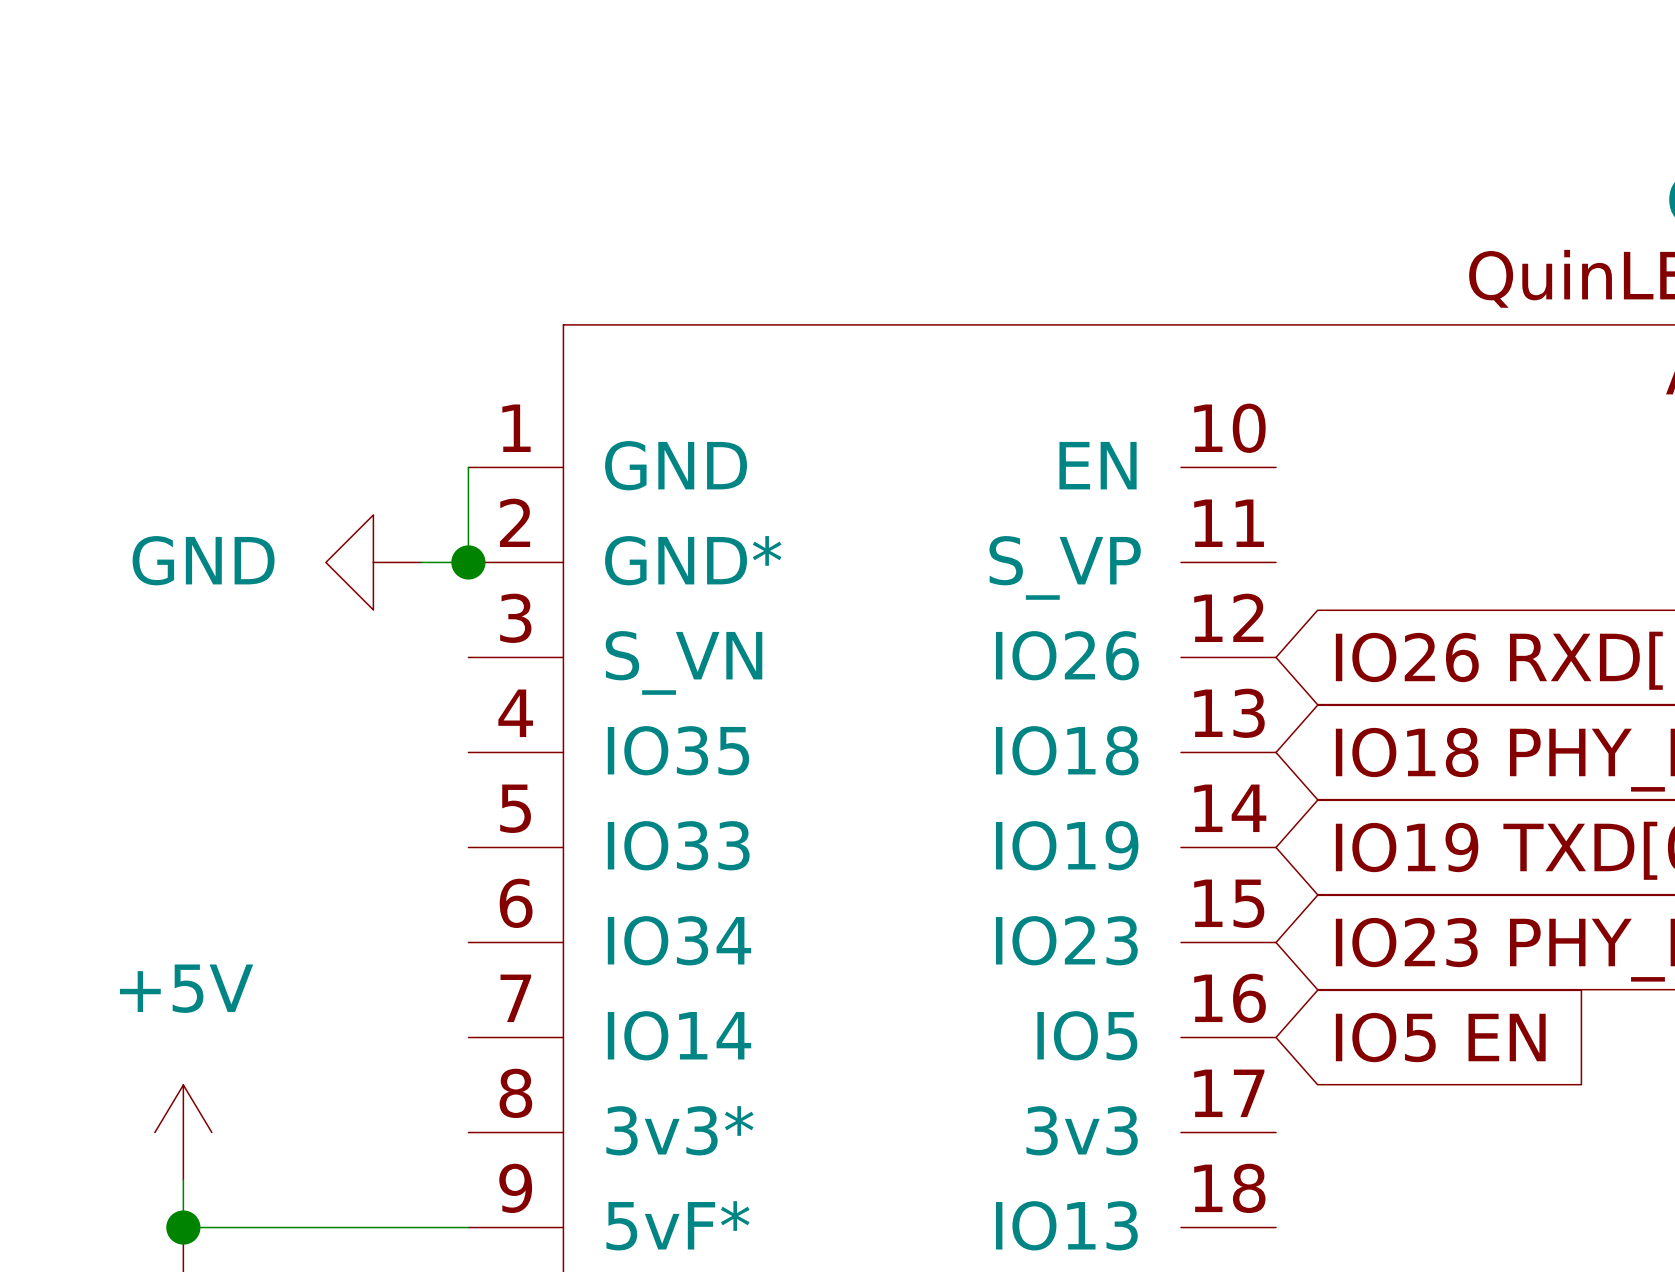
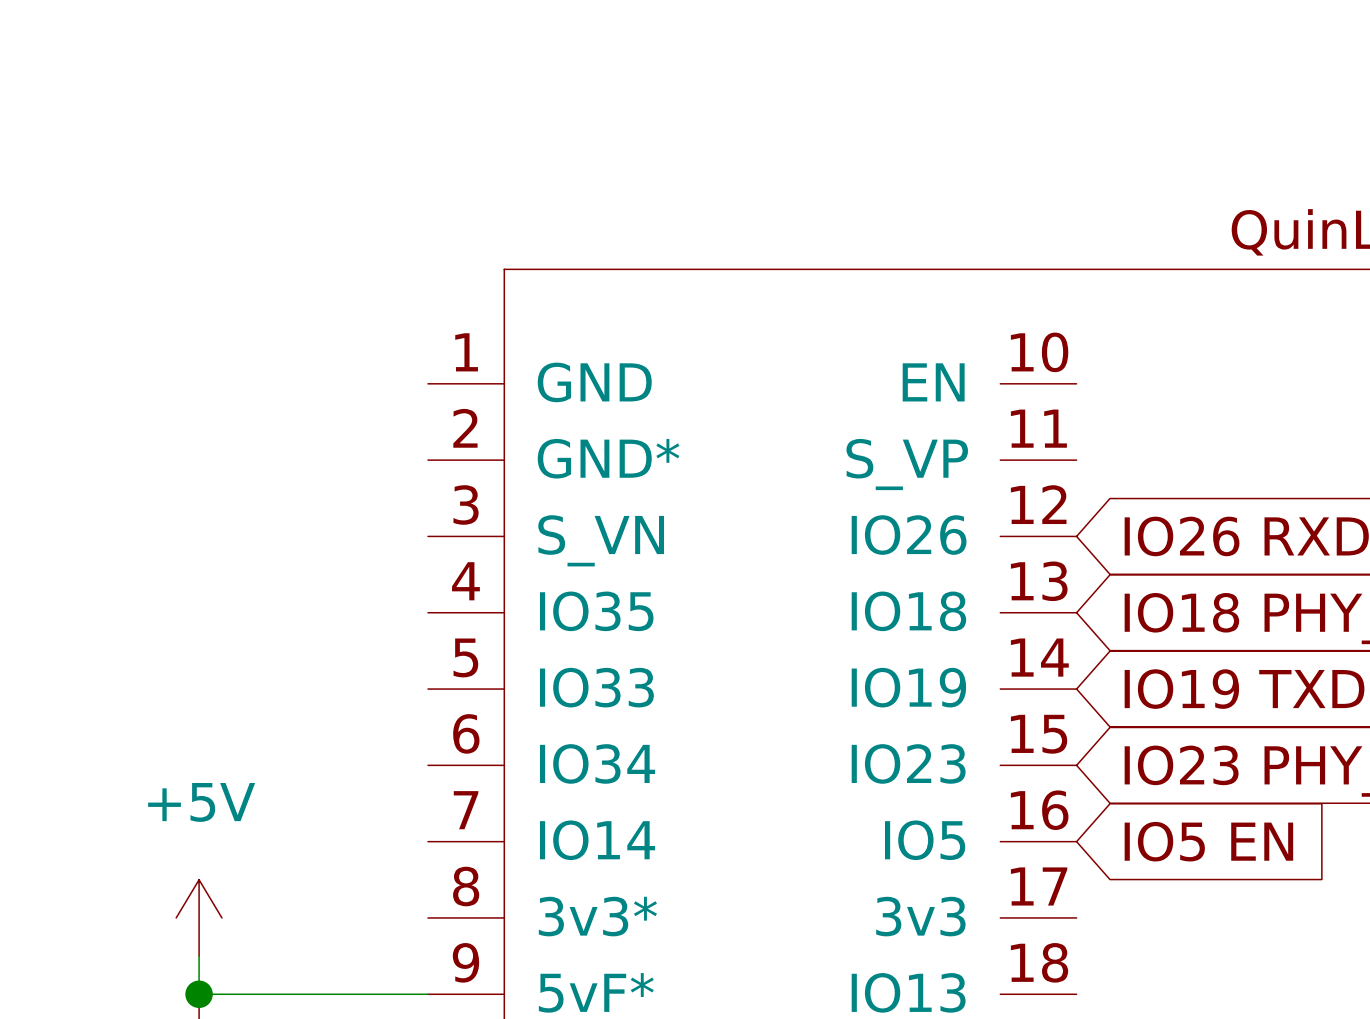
wire: (468, 467) (468, 562) (420, 562) -> none
power symbol: GND (373, 562) -> none
junction: (468, 562) -> none

